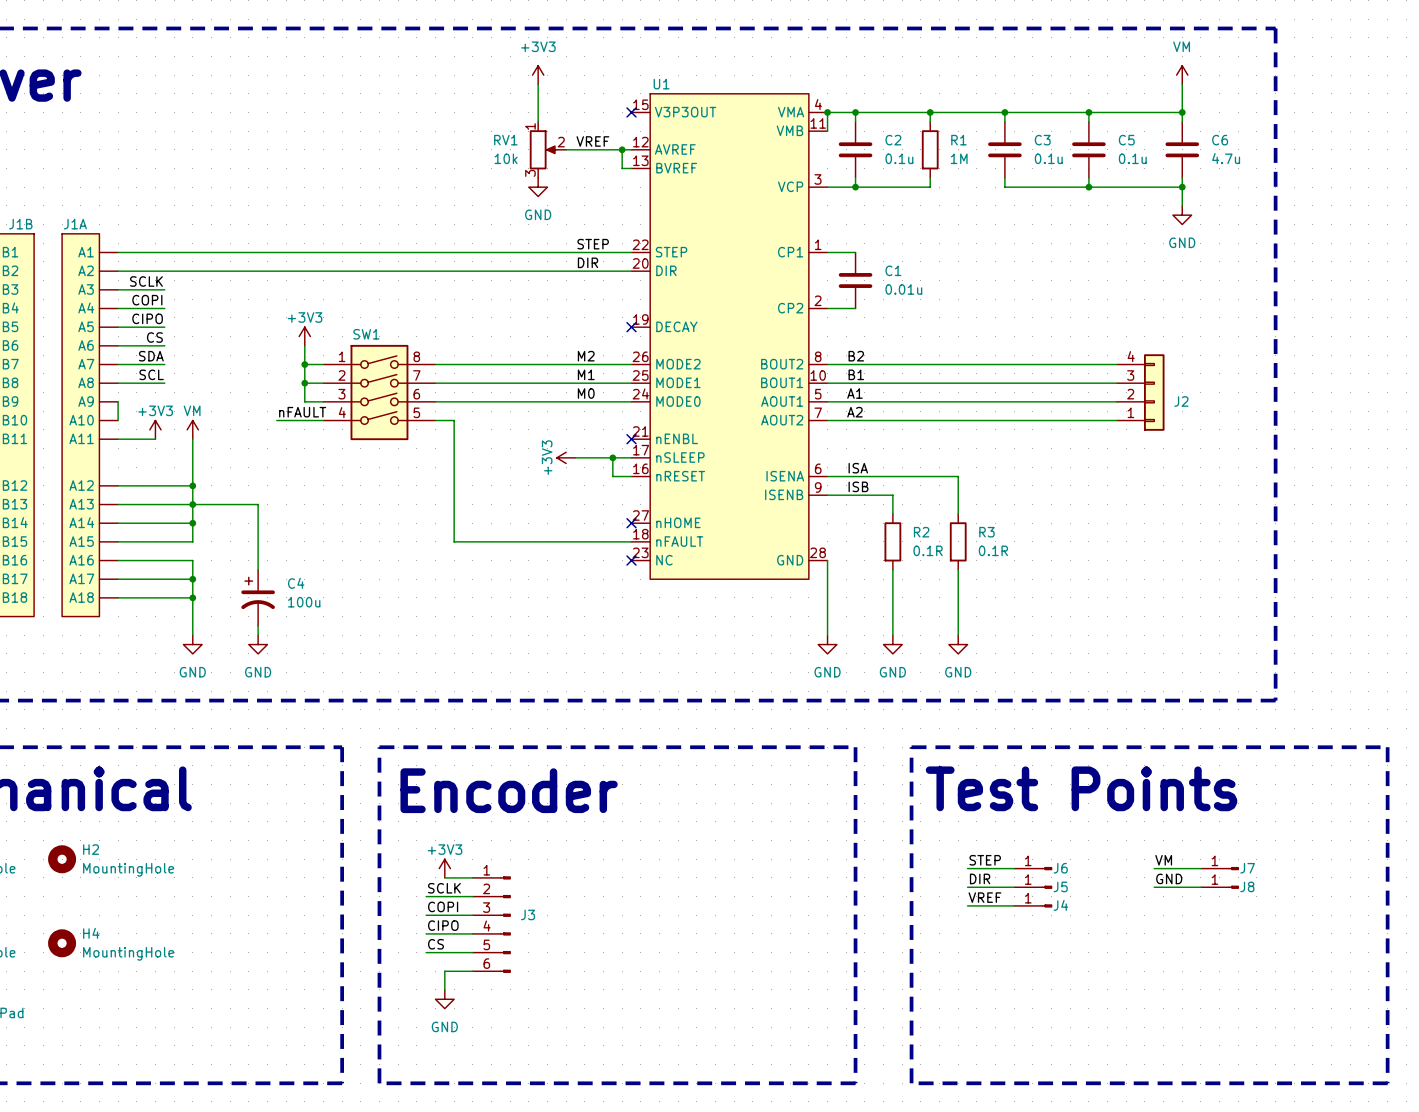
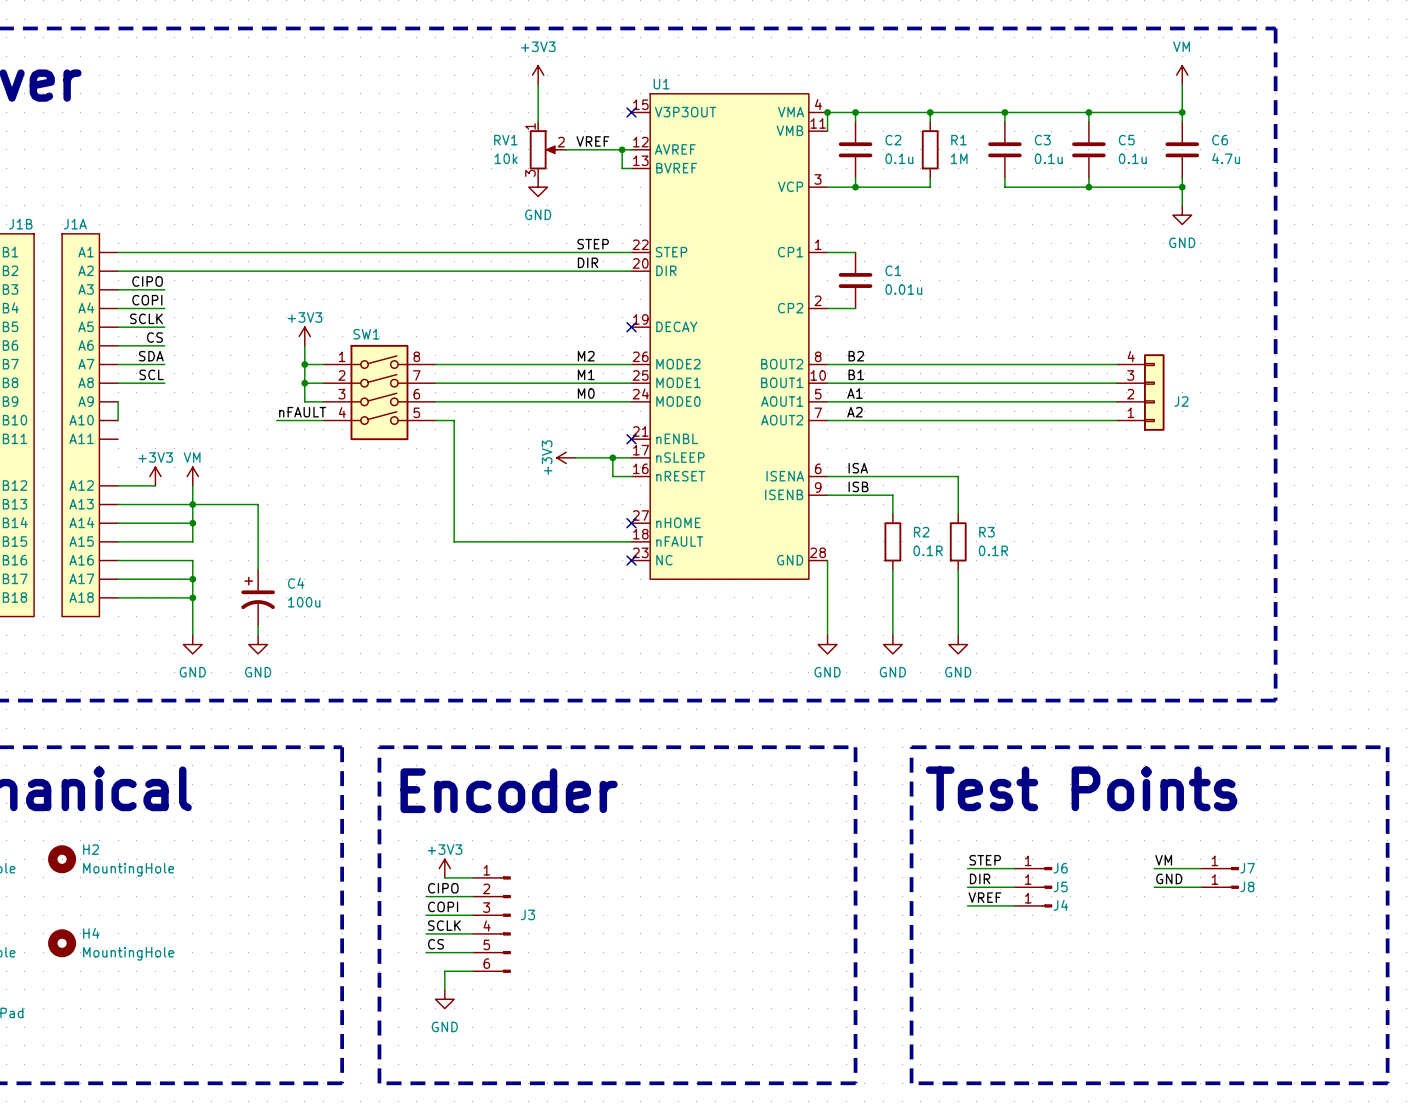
label: SCLK (146, 281) -> CIPO (147, 281)
label: CIPO (147, 318) -> SCLK (146, 318)
power symbol position: +3V3 (155, 429) -> +3V3 (155, 476)
power symbol position: VM (192, 429) -> VM (192, 476)
wire: (118, 439) (155, 439) -> none
wire: (192, 439) (192, 485) (155, 485) -> none
junction: (192, 485) -> none
label: SCLK (444, 888) -> CIPO (443, 888)
label: CIPO (443, 925) -> SCLK (444, 925)

